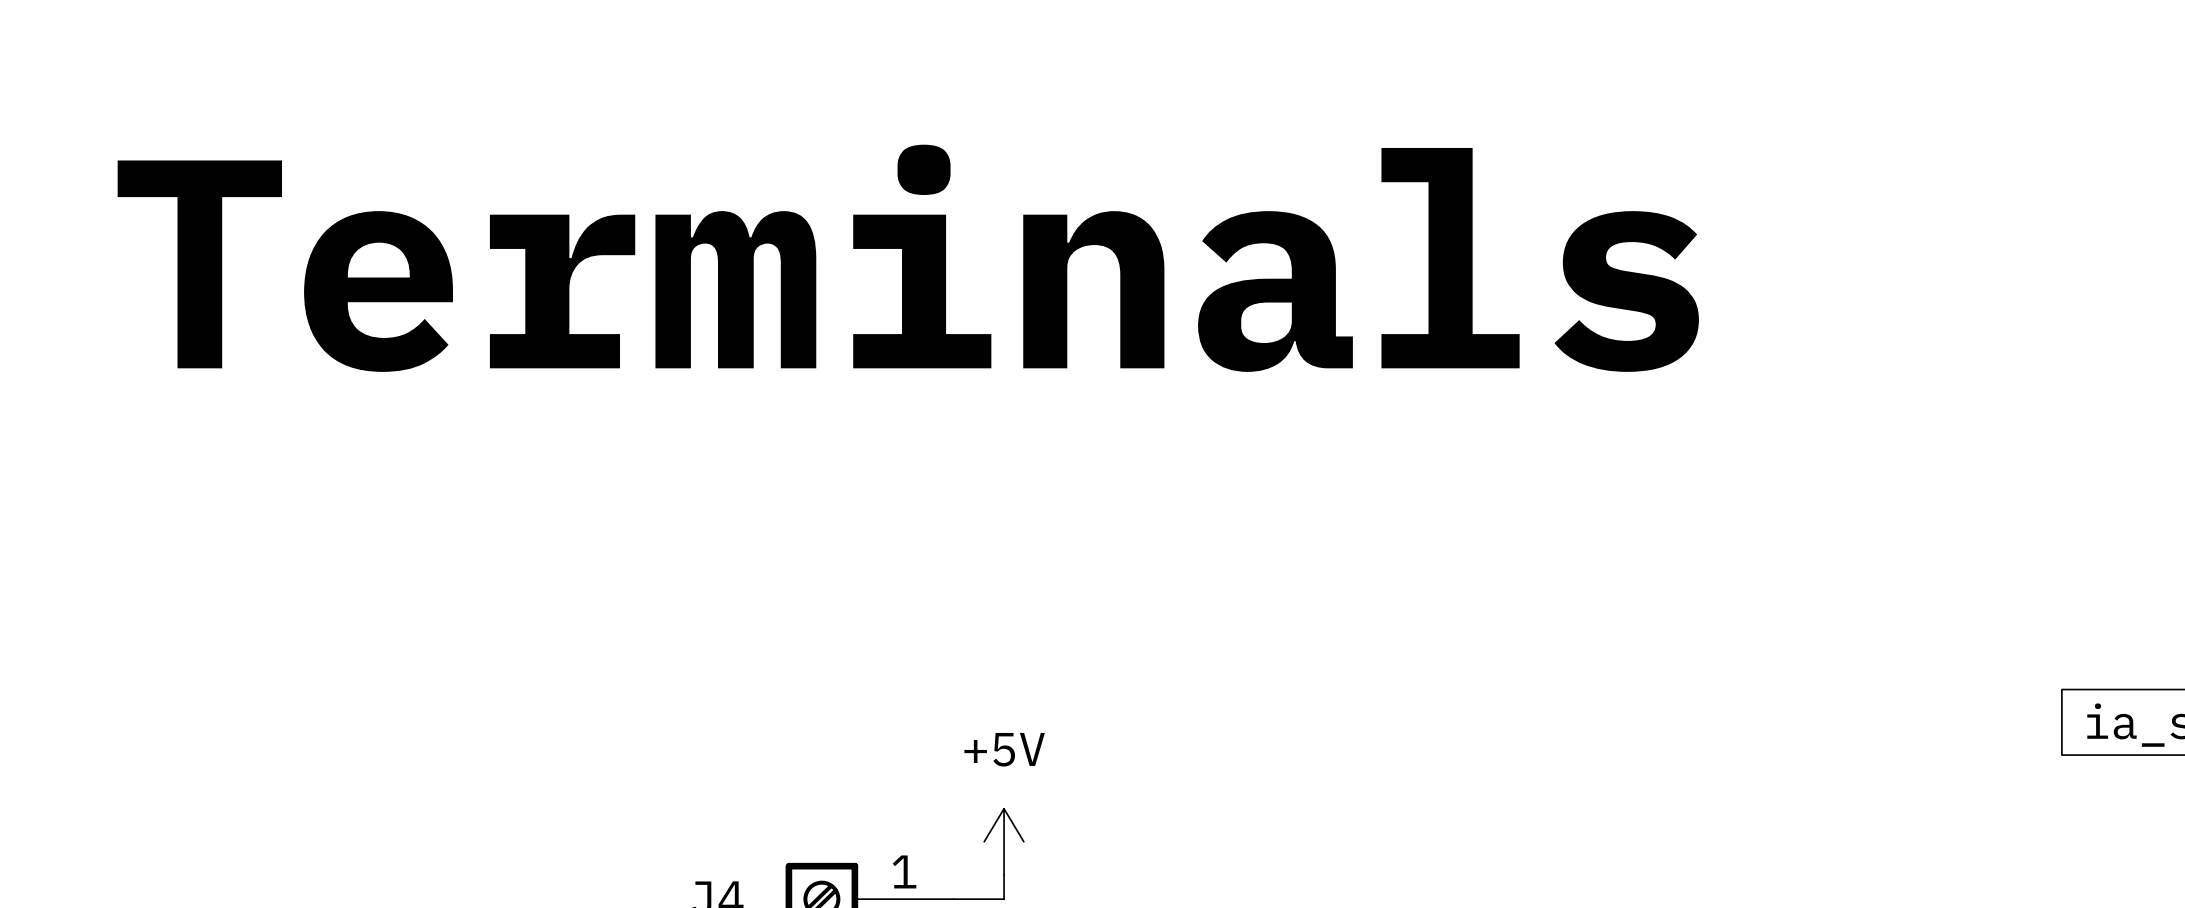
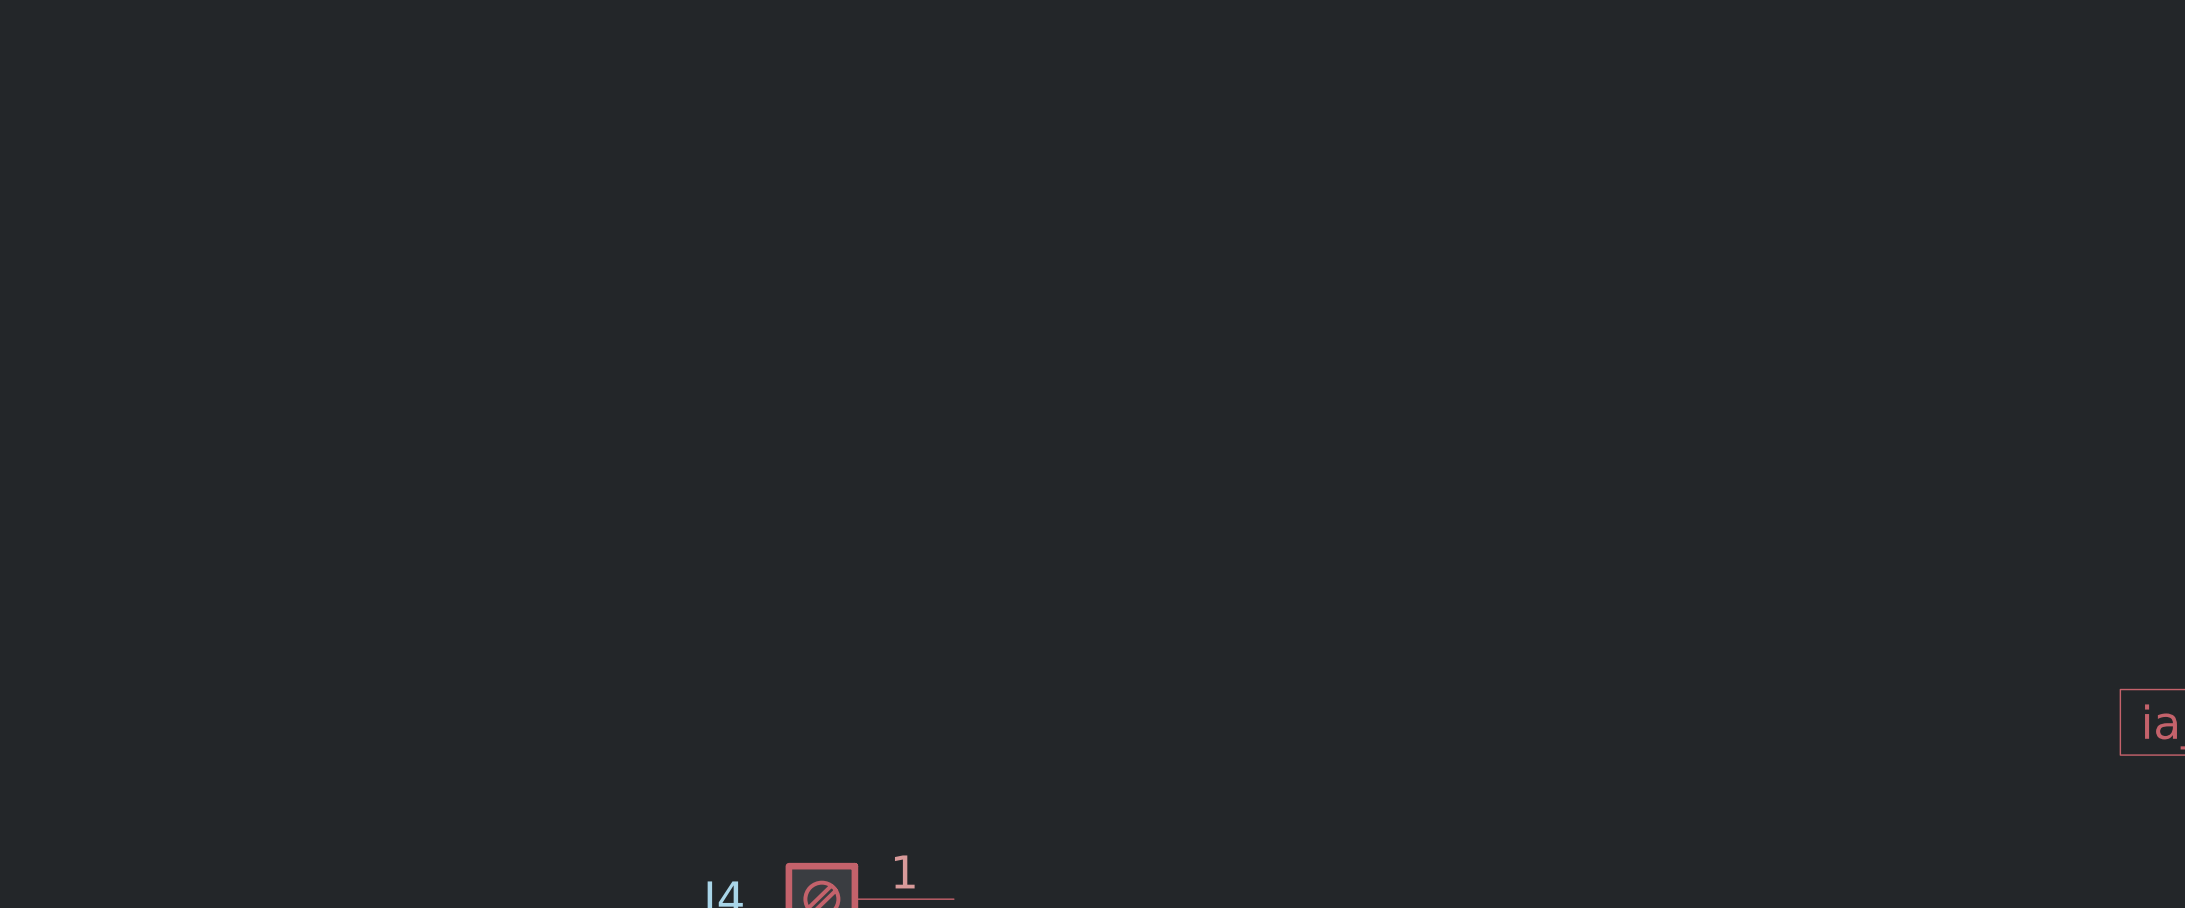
text: Terminals (908, 258) -> none
power symbol: +5V (1004, 841) -> none
wire: (1004, 874) (1004, 899) (953, 899) -> none

